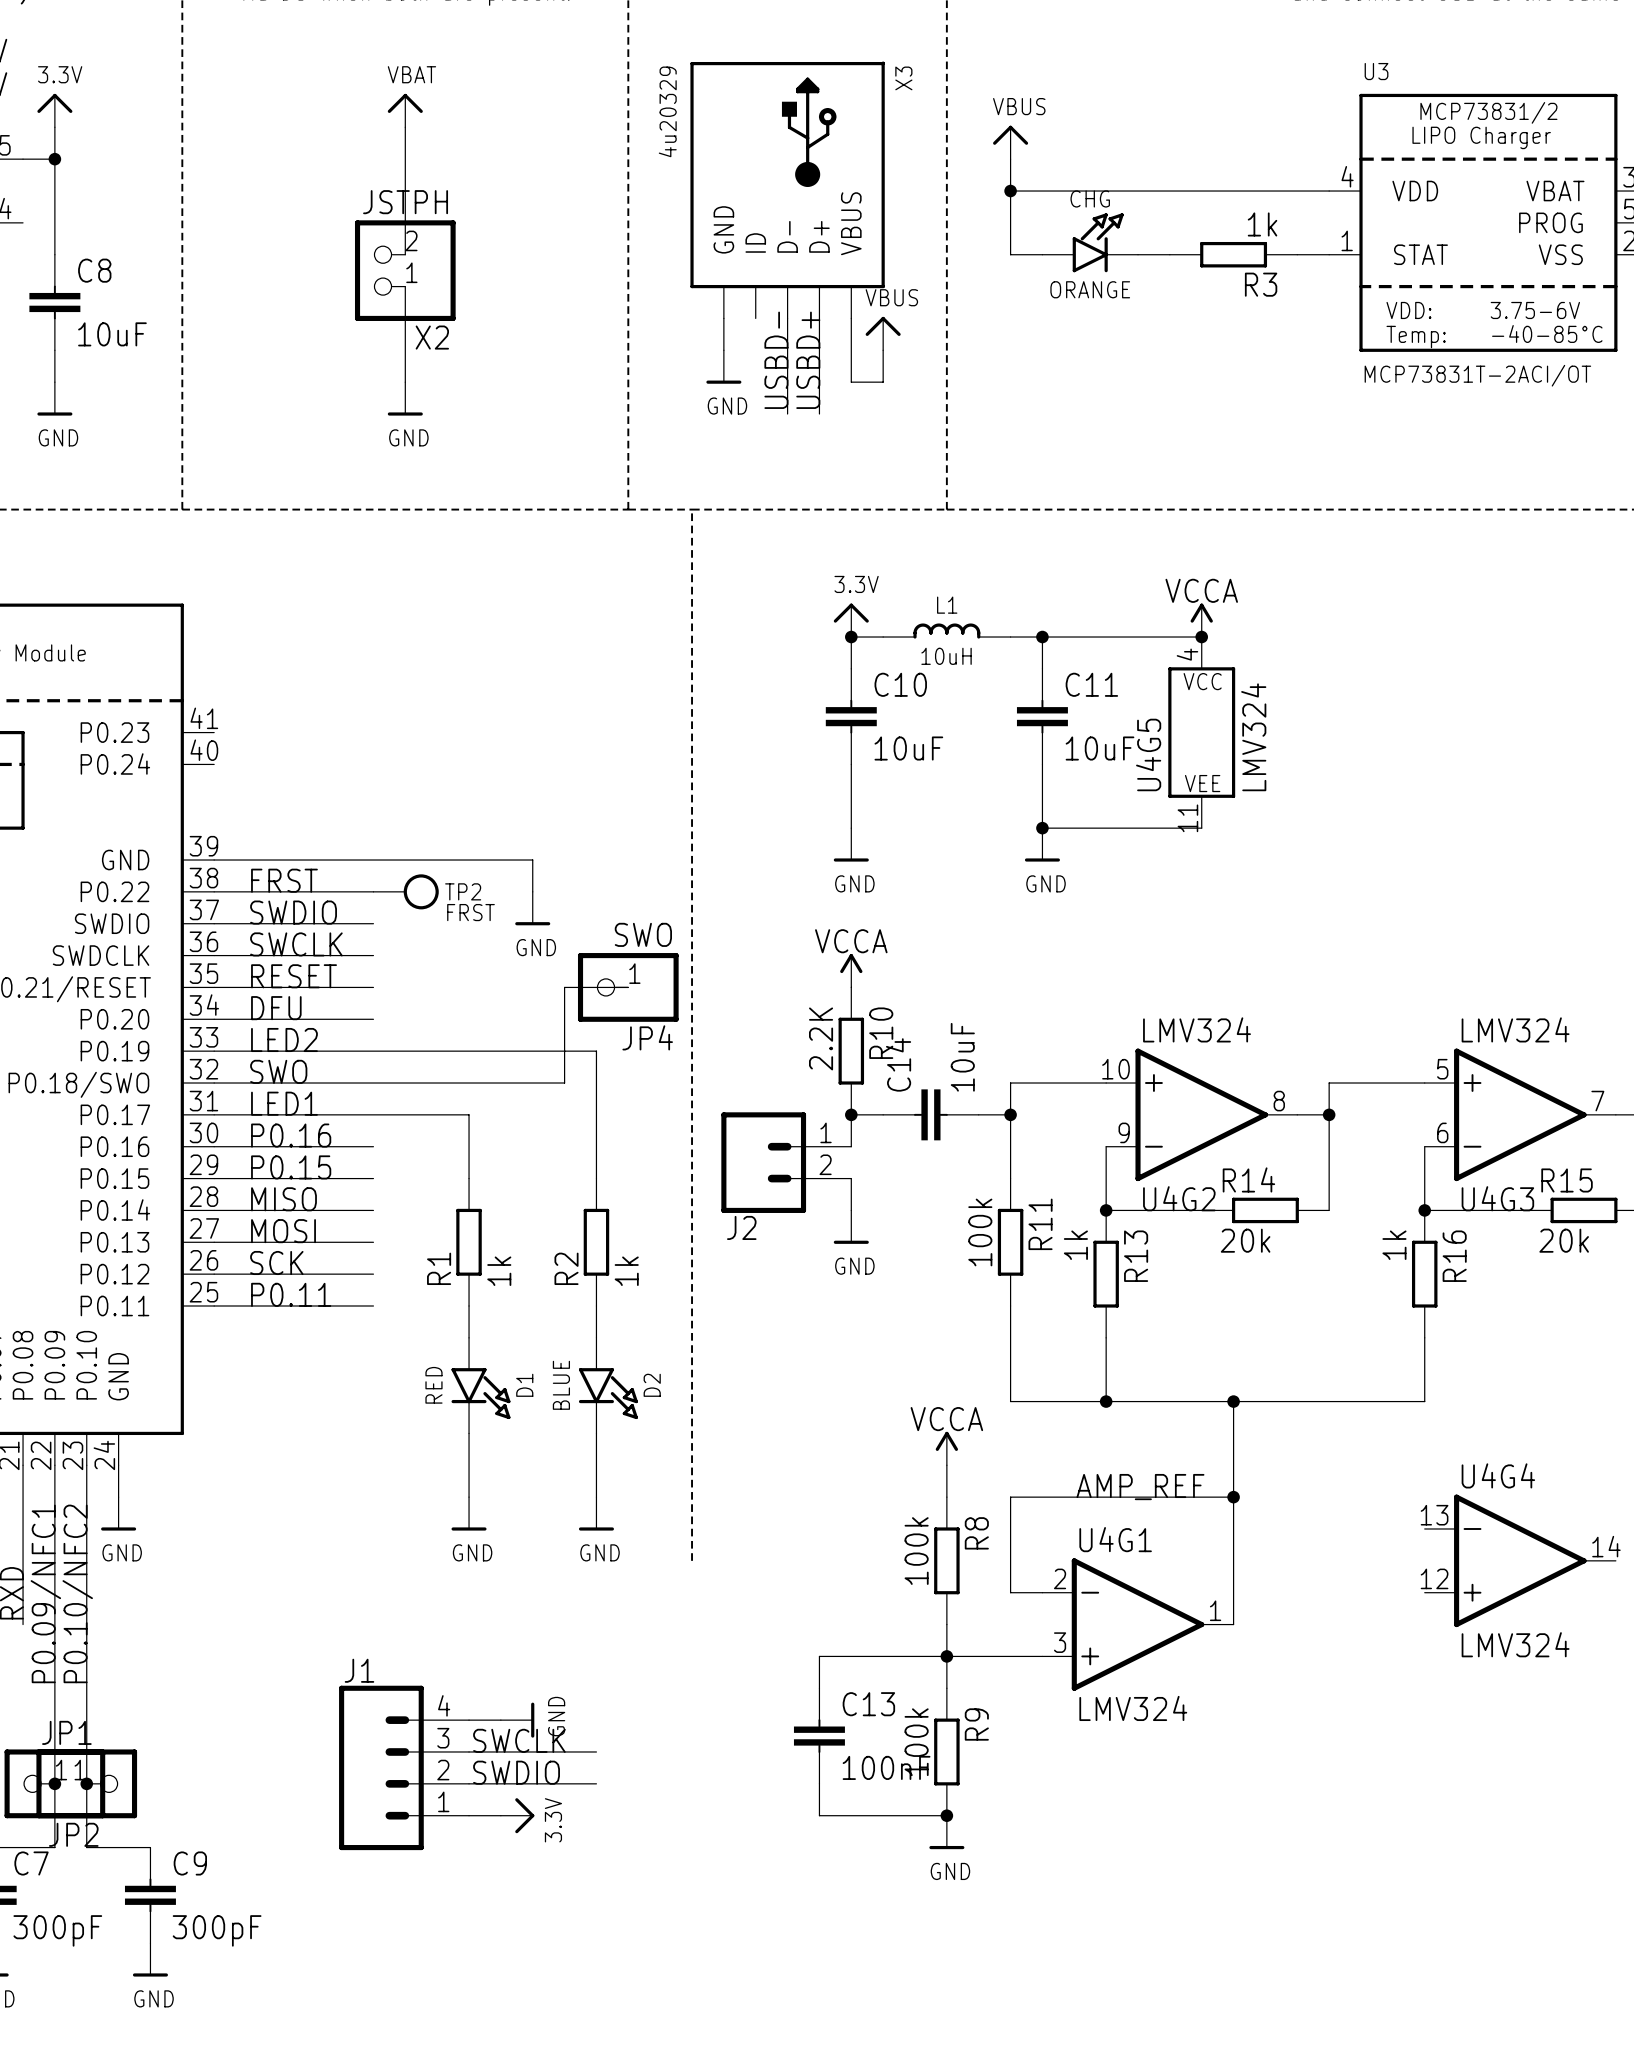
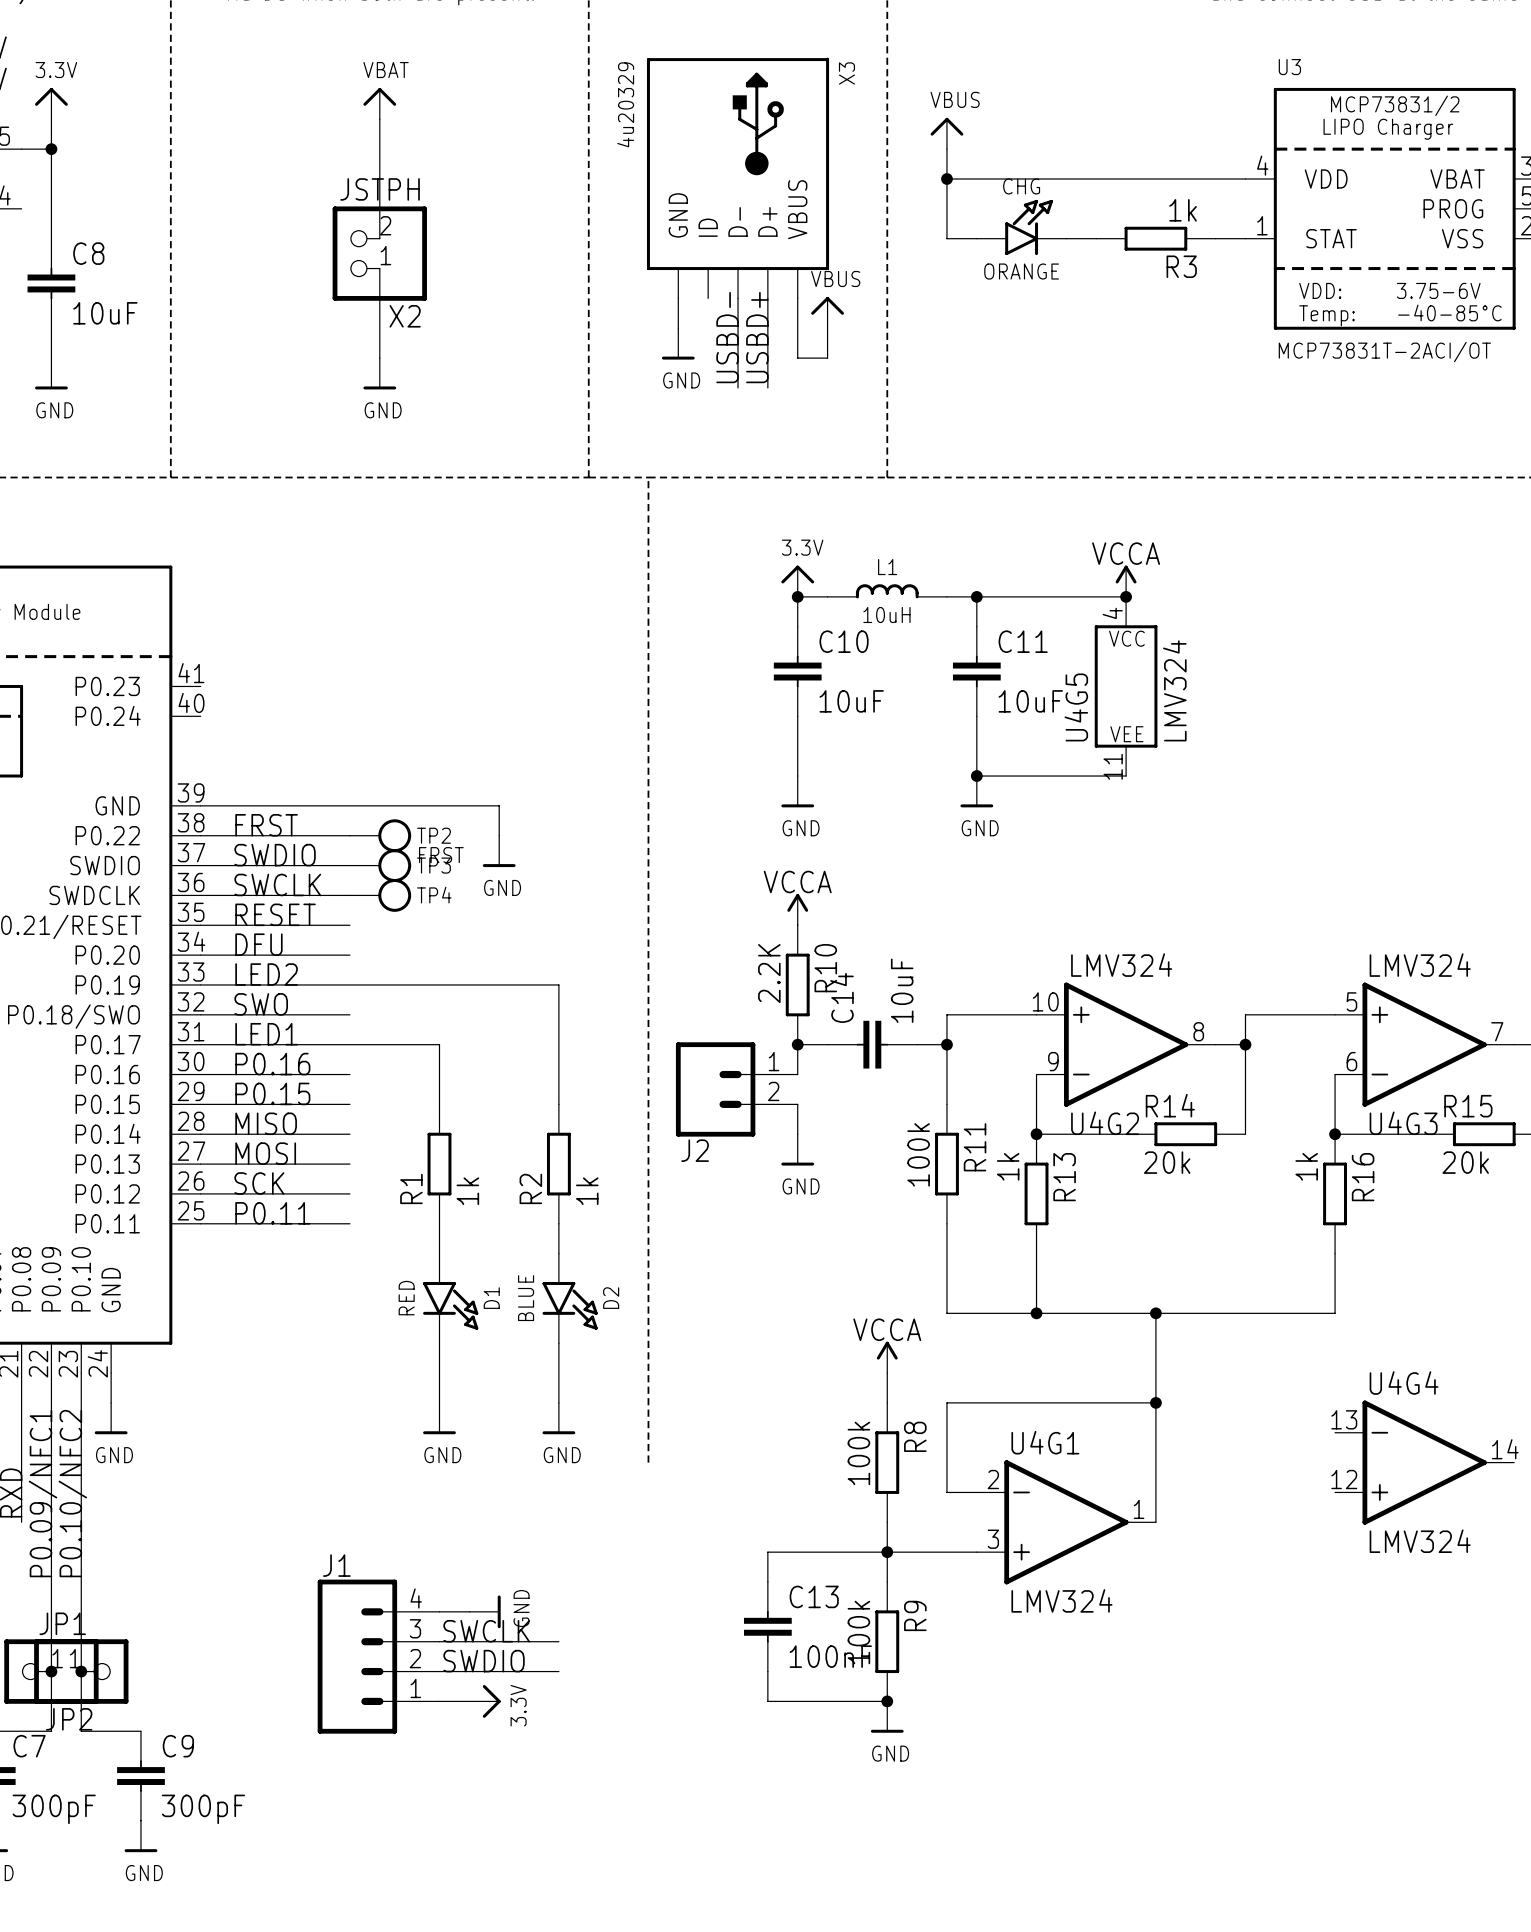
TP3: none -> (380, 865)
TP4: none -> (380, 895)
wire: (628, 987) (564, 987) (564, 1083) (373, 1083) -> none
JP4: SWO (628, 987) -> none
label: AMP_REF (1140, 1487) -> none

